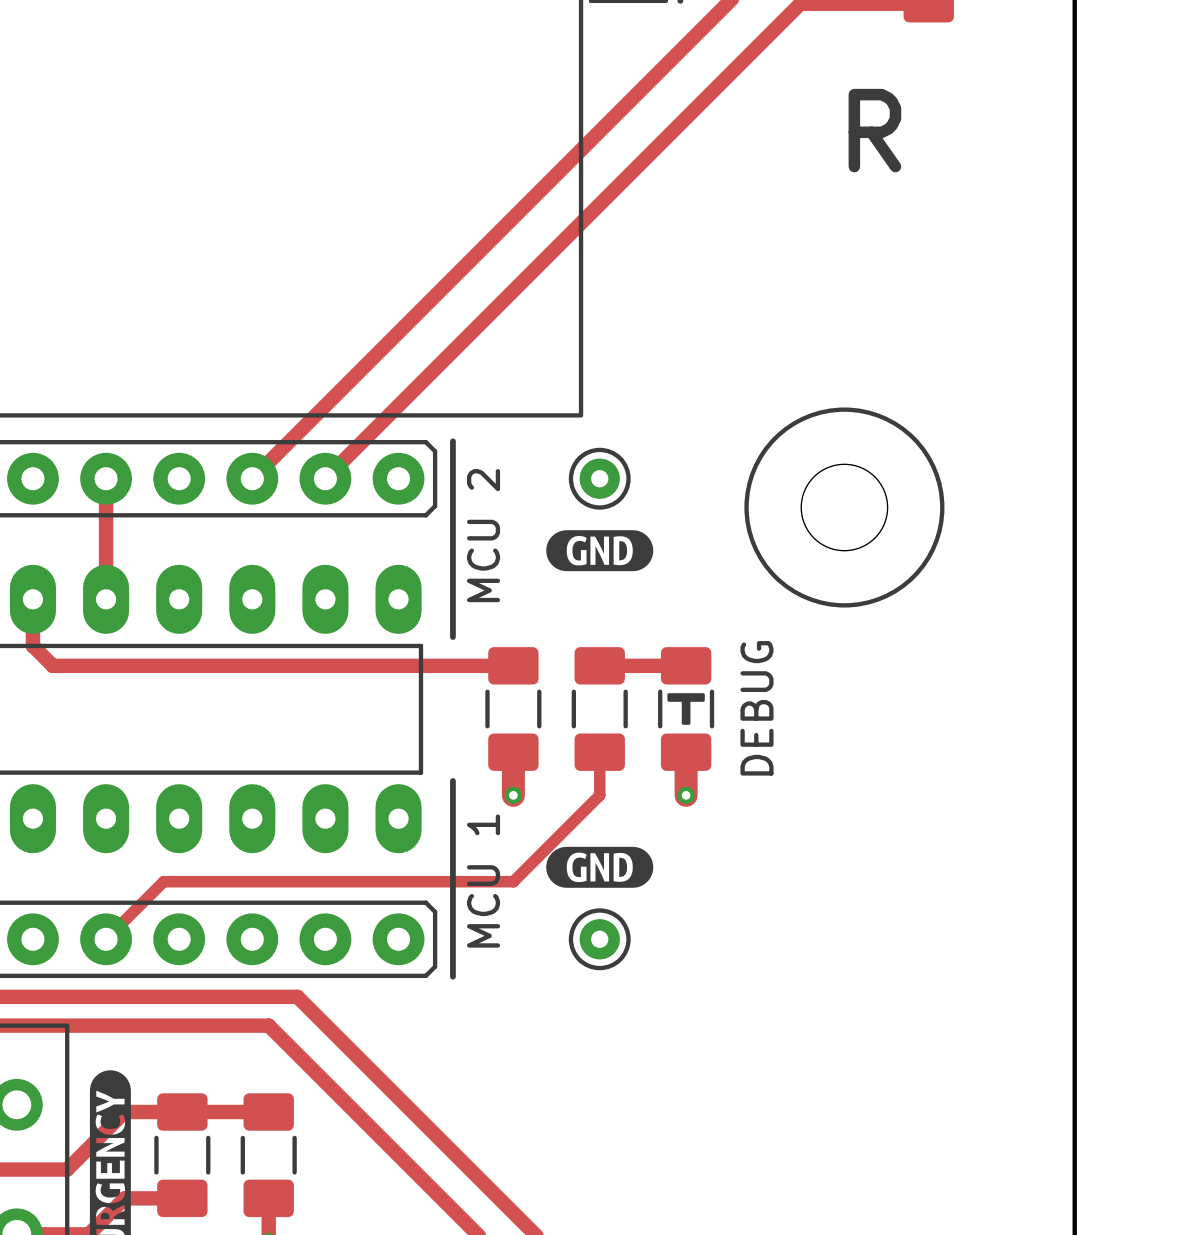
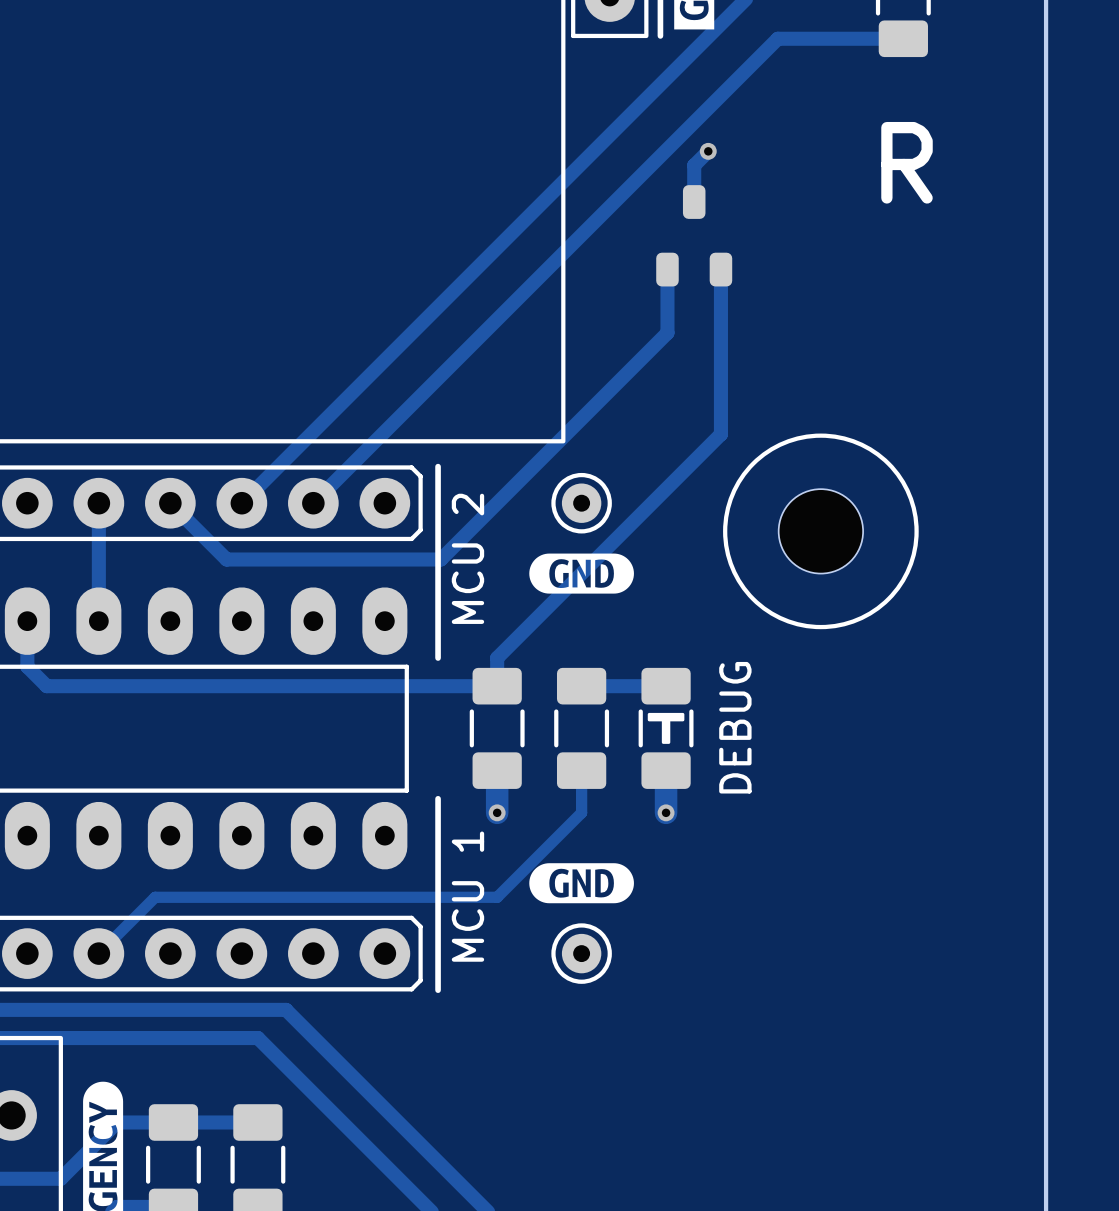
track: none -> (708, 151) (694, 165) (694, 202)
via: none -> (708, 151)
text position: R (874, 130) -> R (907, 162)
part: none -> (694, 235)
track: none -> (667, 269) (667, 332) (440, 559) (226, 559) (170, 503)
track: none -> (720, 269) (720, 434) (497, 658) (497, 686)

